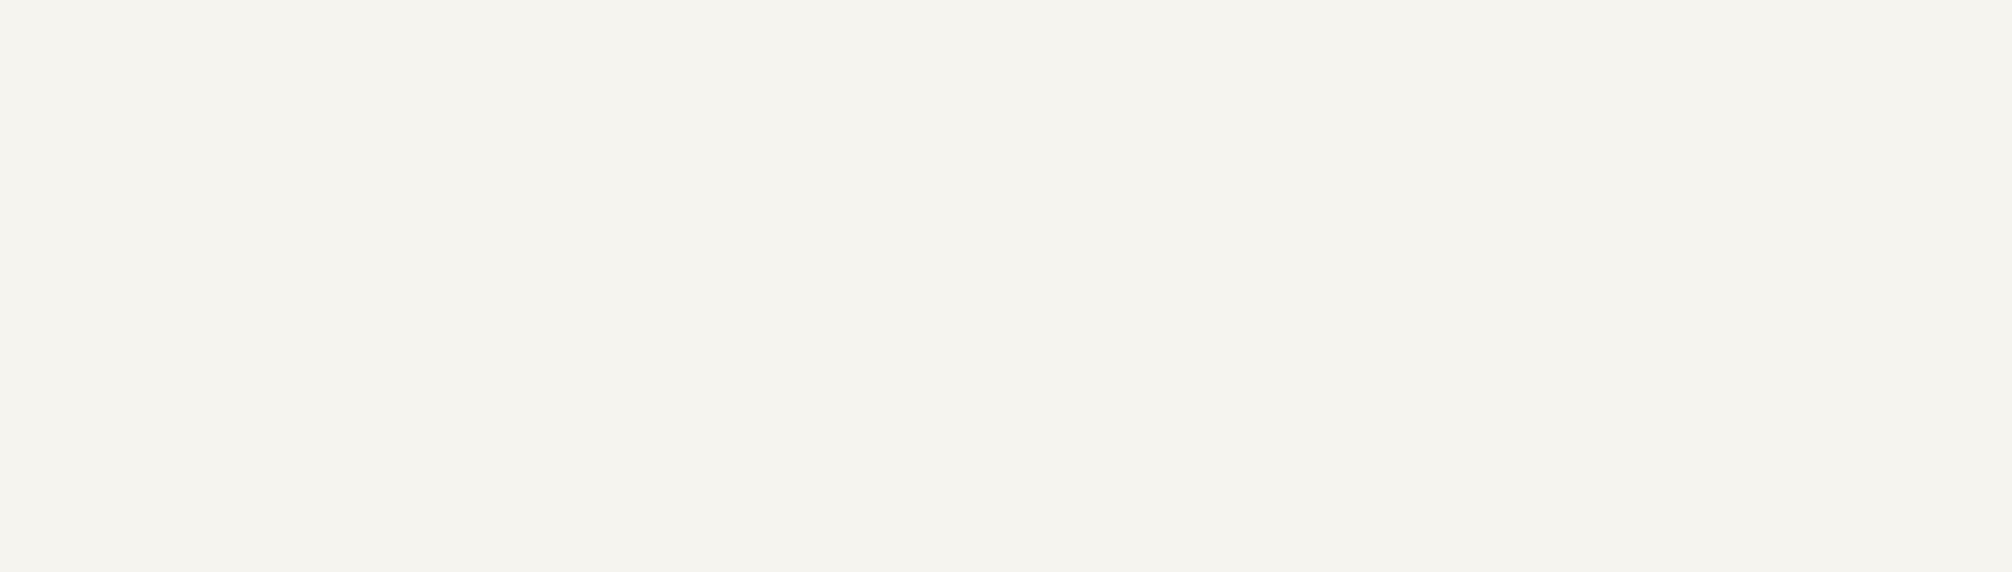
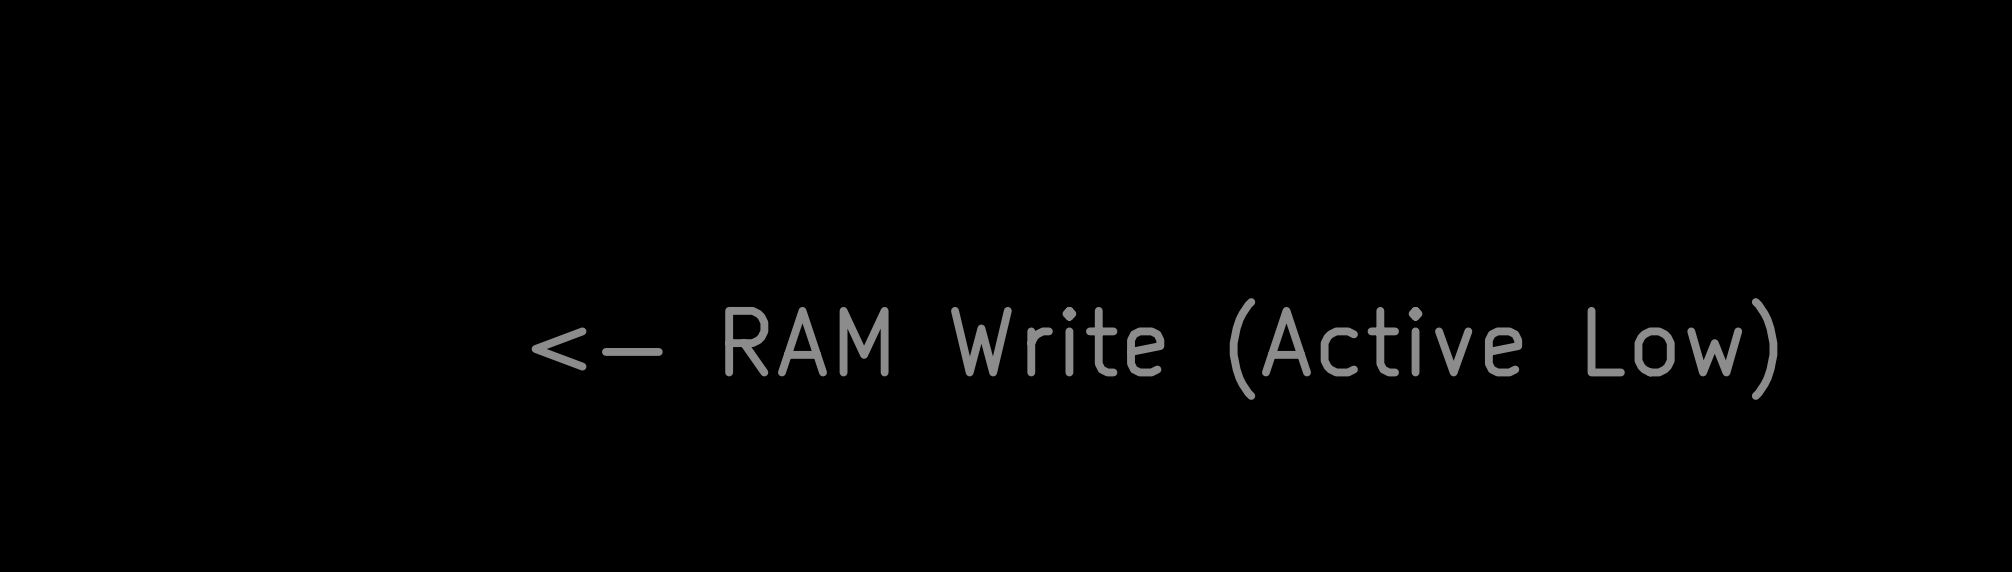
text: none -> <— RAM Write (Active Low) (1154, 349)

